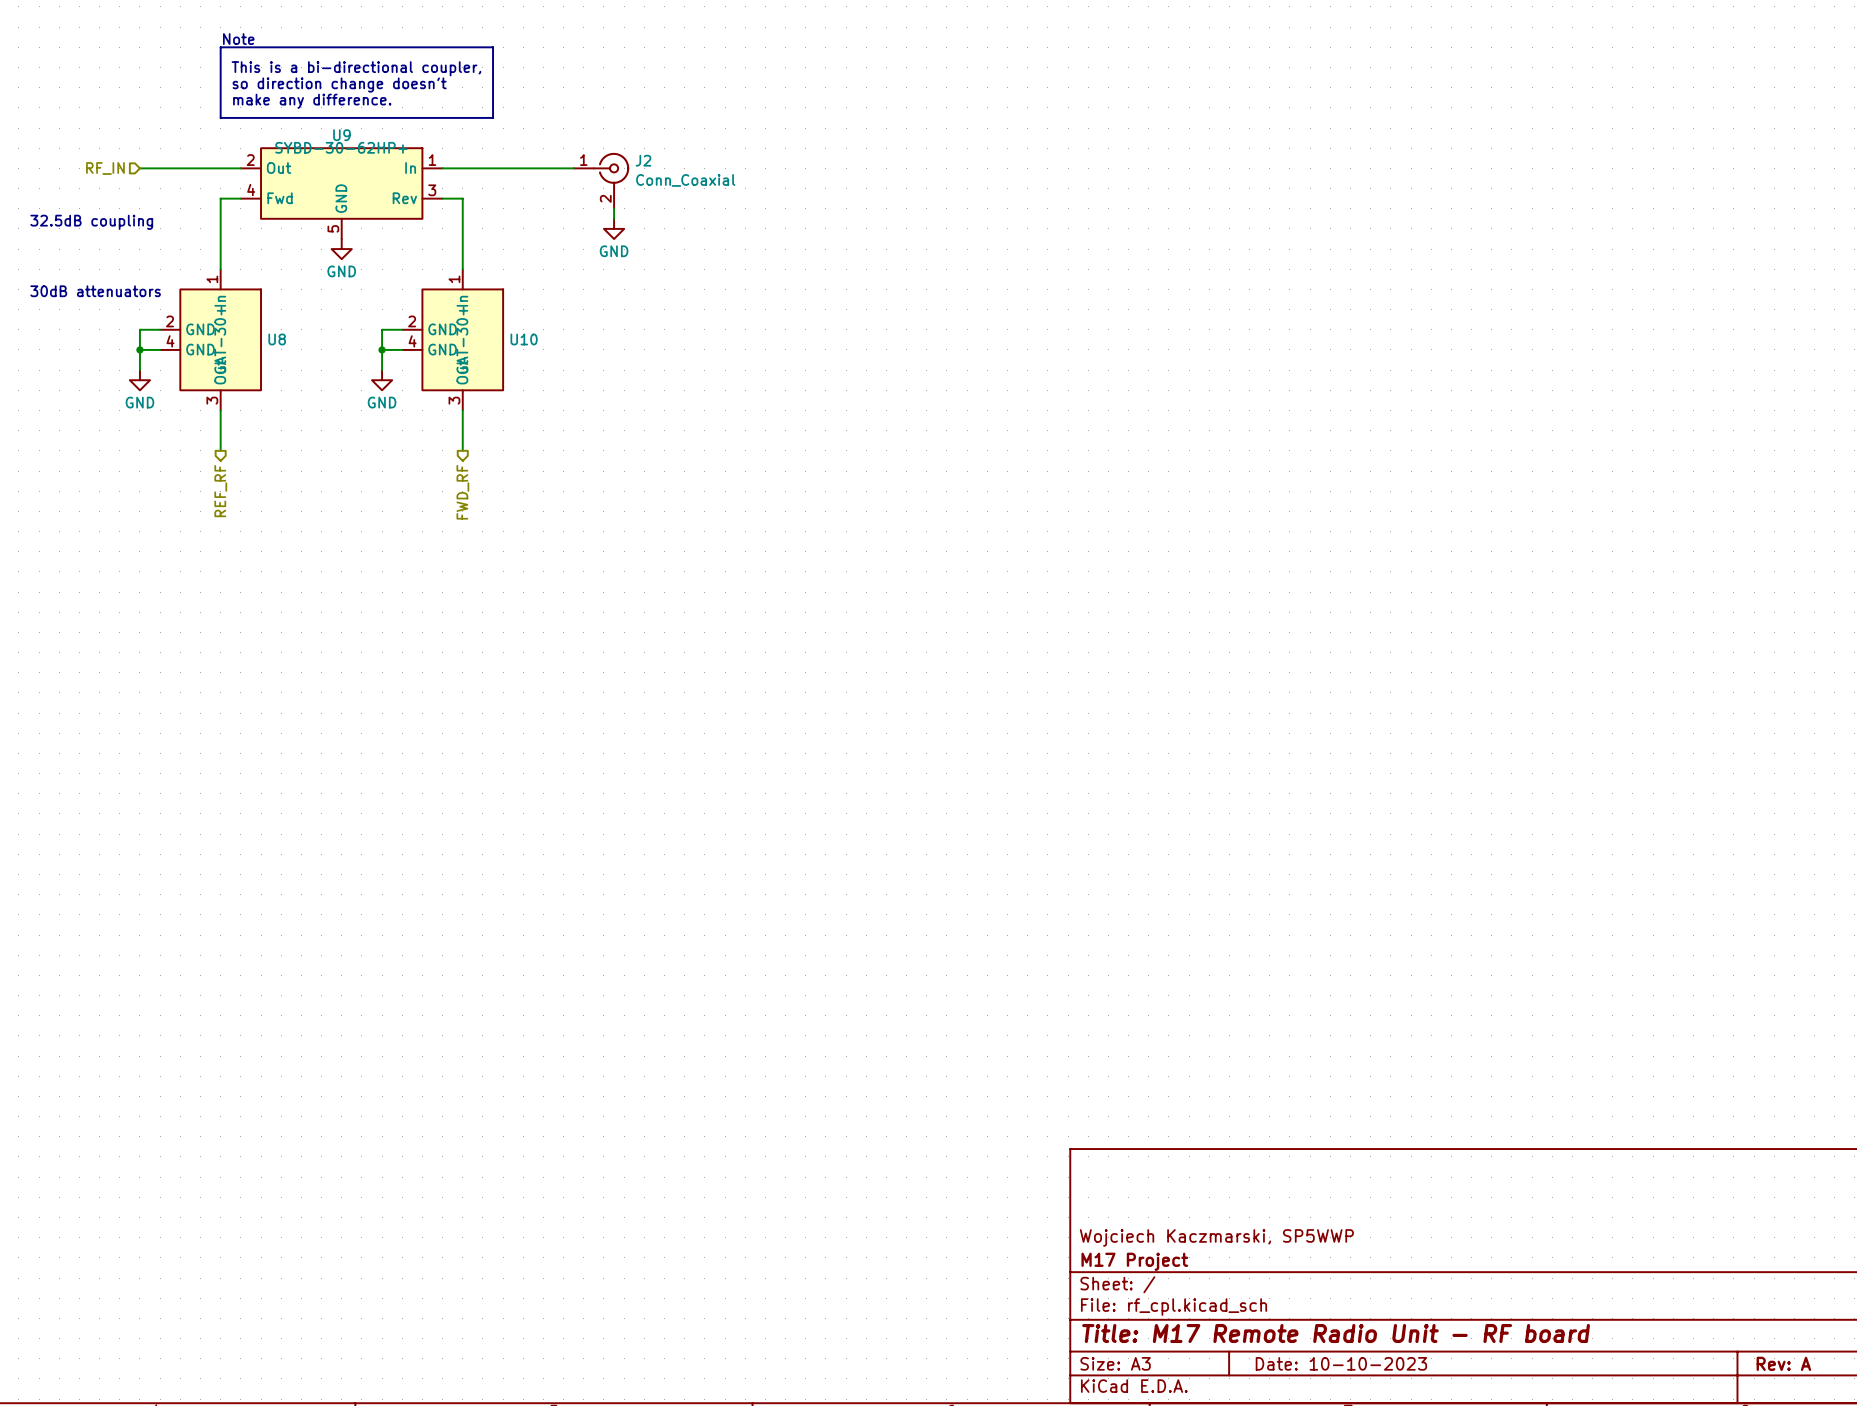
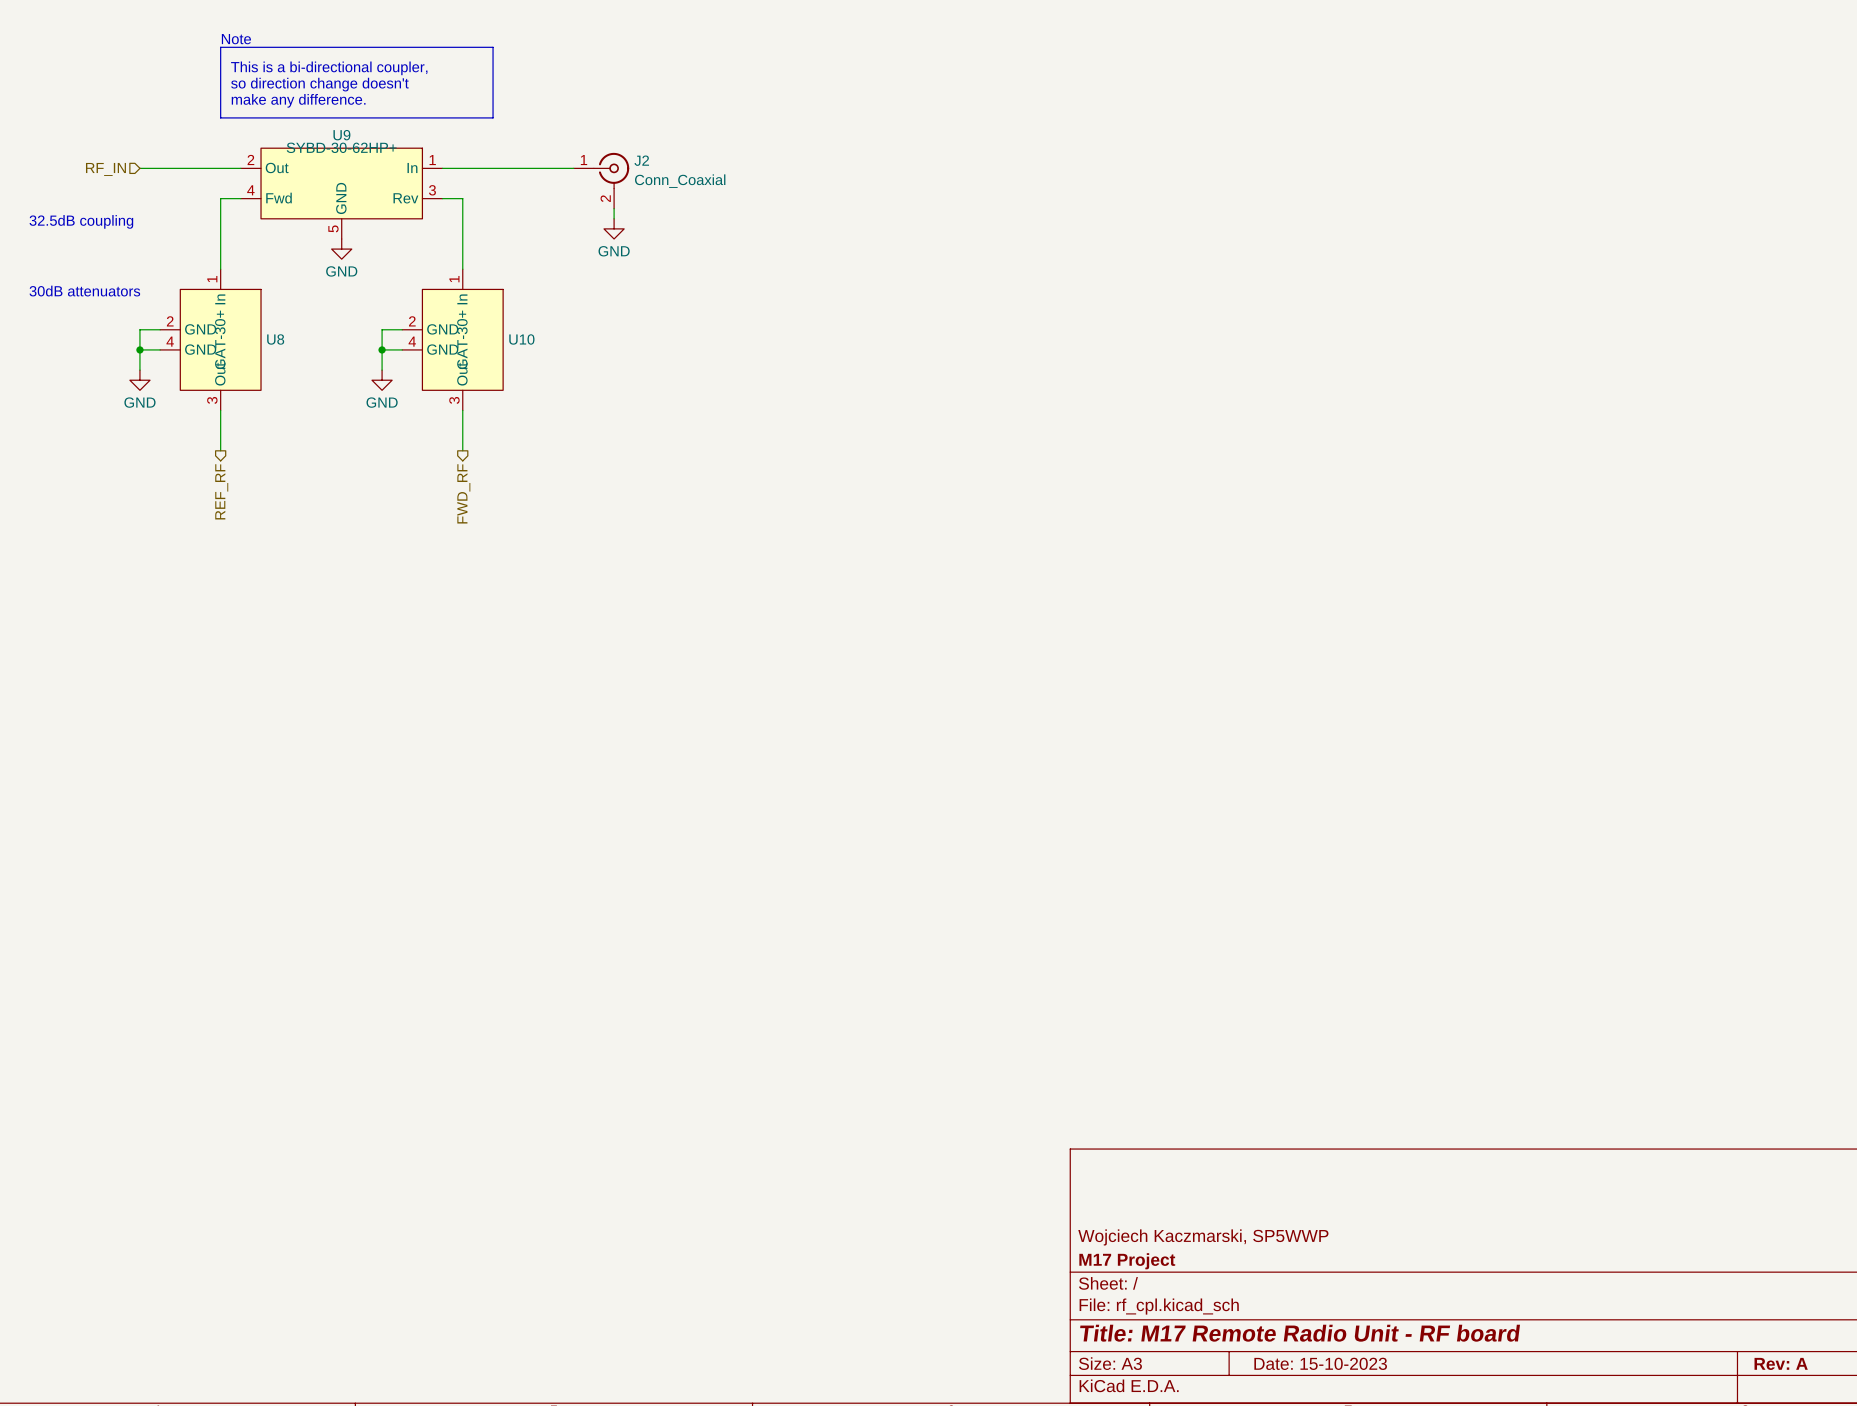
title block: Date: 10-10-2023 (1341, 1363) -> Date: 15-10-2023 (1320, 1363)

